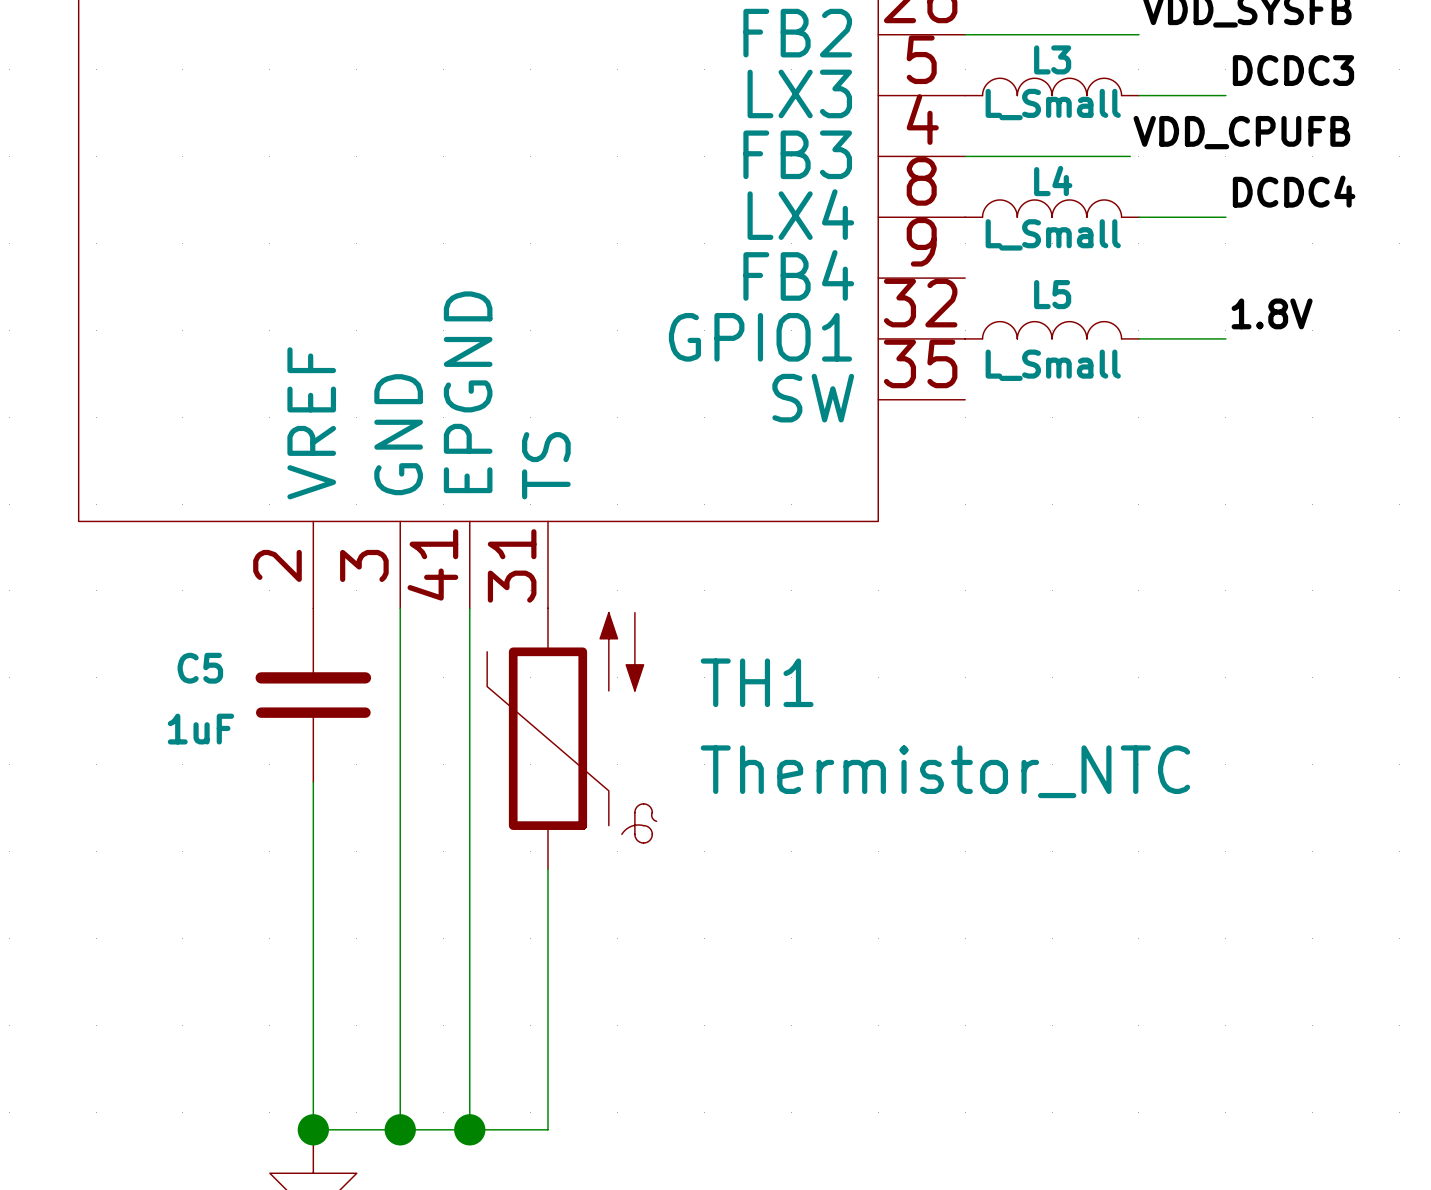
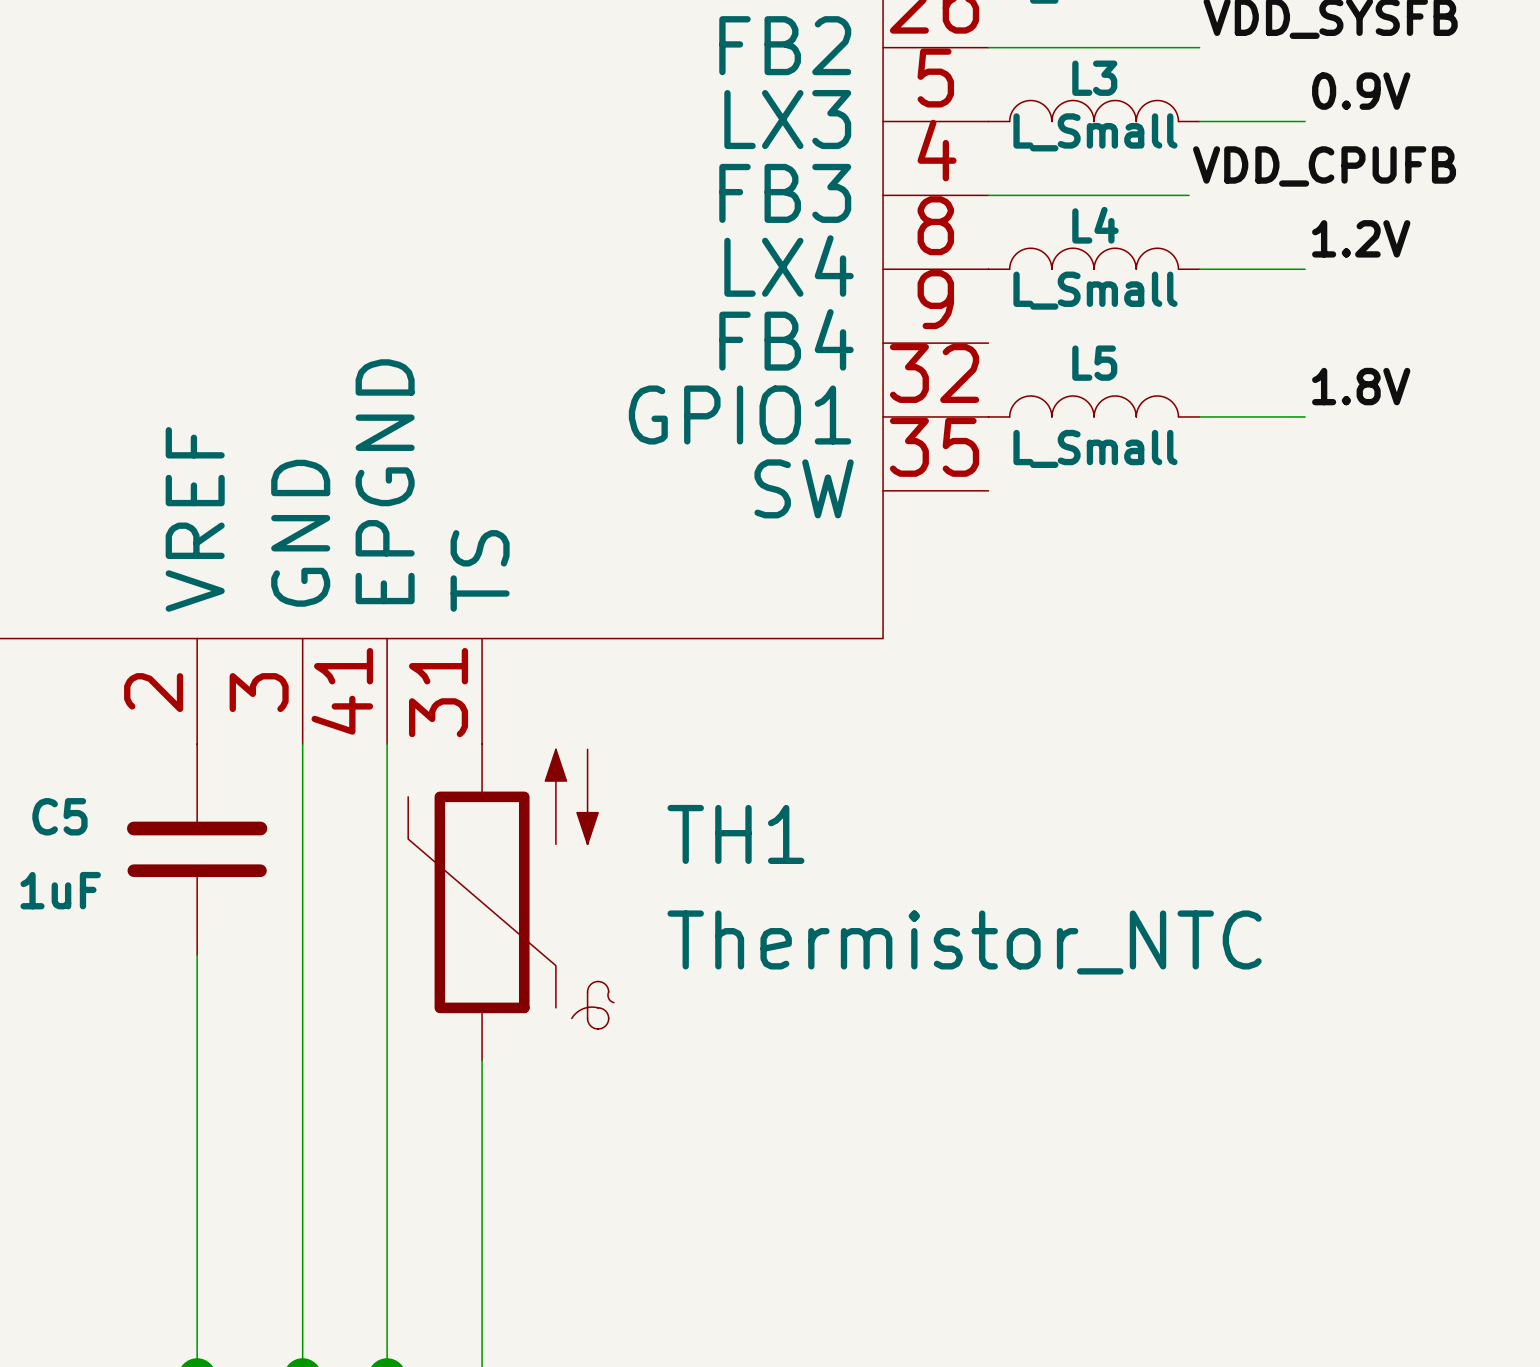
label: DCDC3 (1293, 70) -> 0.9V (1361, 91)
label: DCDC4 (1294, 191) -> 1.2V (1361, 238)

